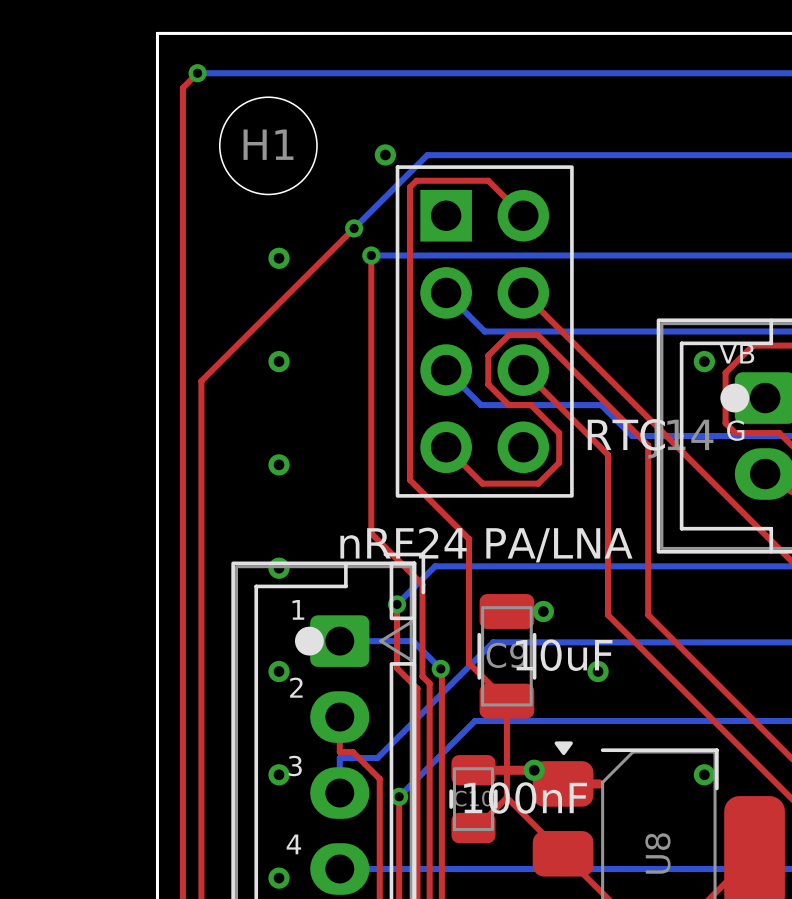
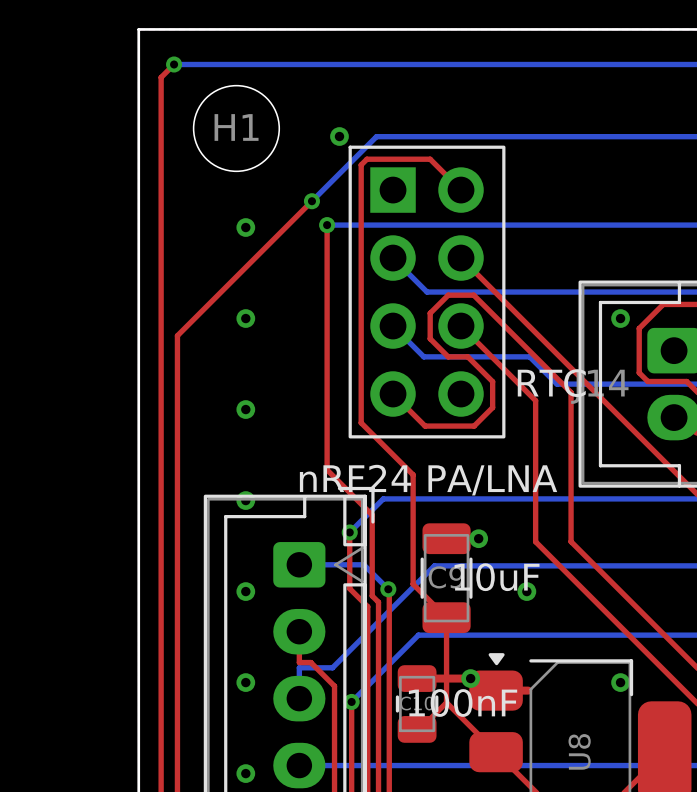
text: VB (736, 353) -> none
drawing: [720, 383, 750, 413] -> none
text: G (735, 430) -> none
text: 1 (298, 609) -> none
drawing: [294, 626, 324, 656] -> none
text: 2 (296, 687) -> none
text: 3 (295, 766) -> none
text: 4 (293, 844) -> none

